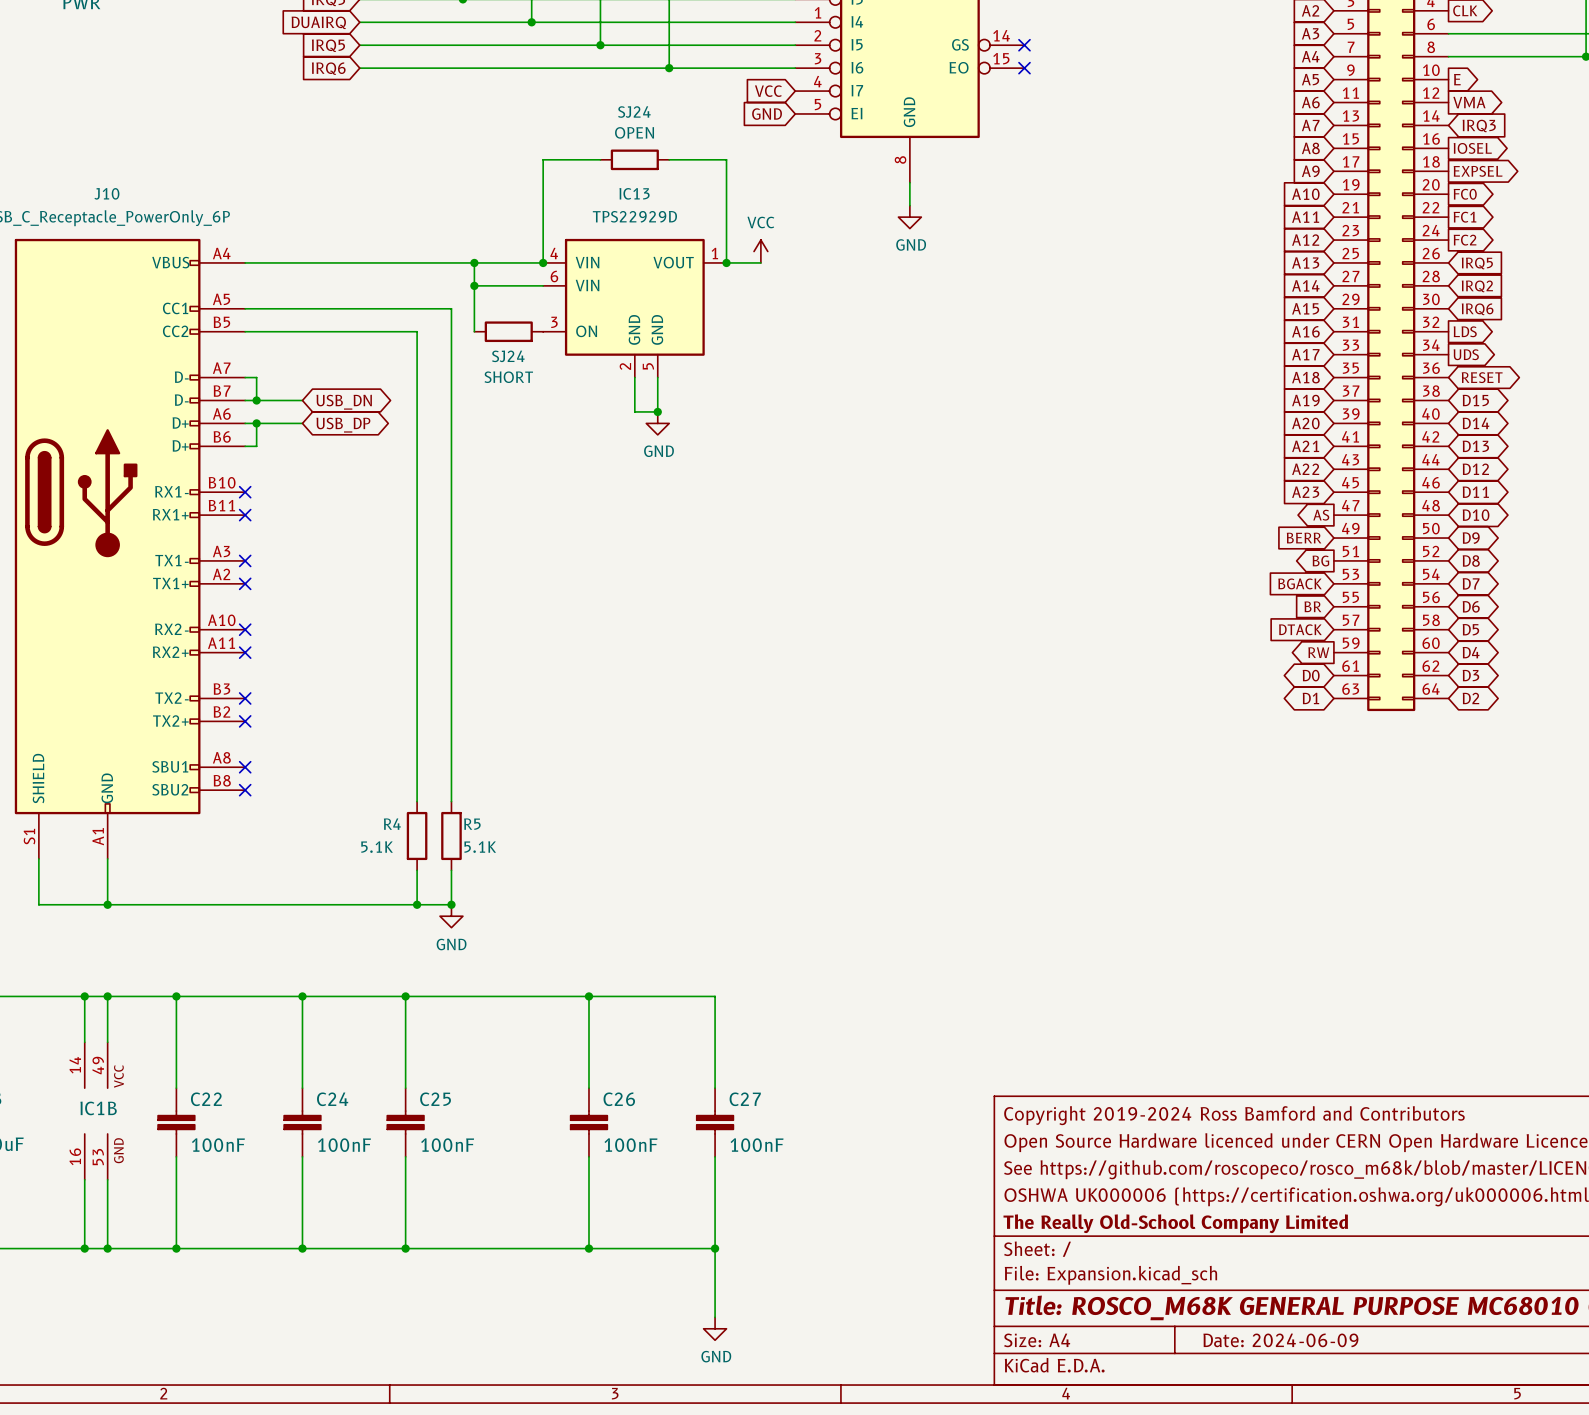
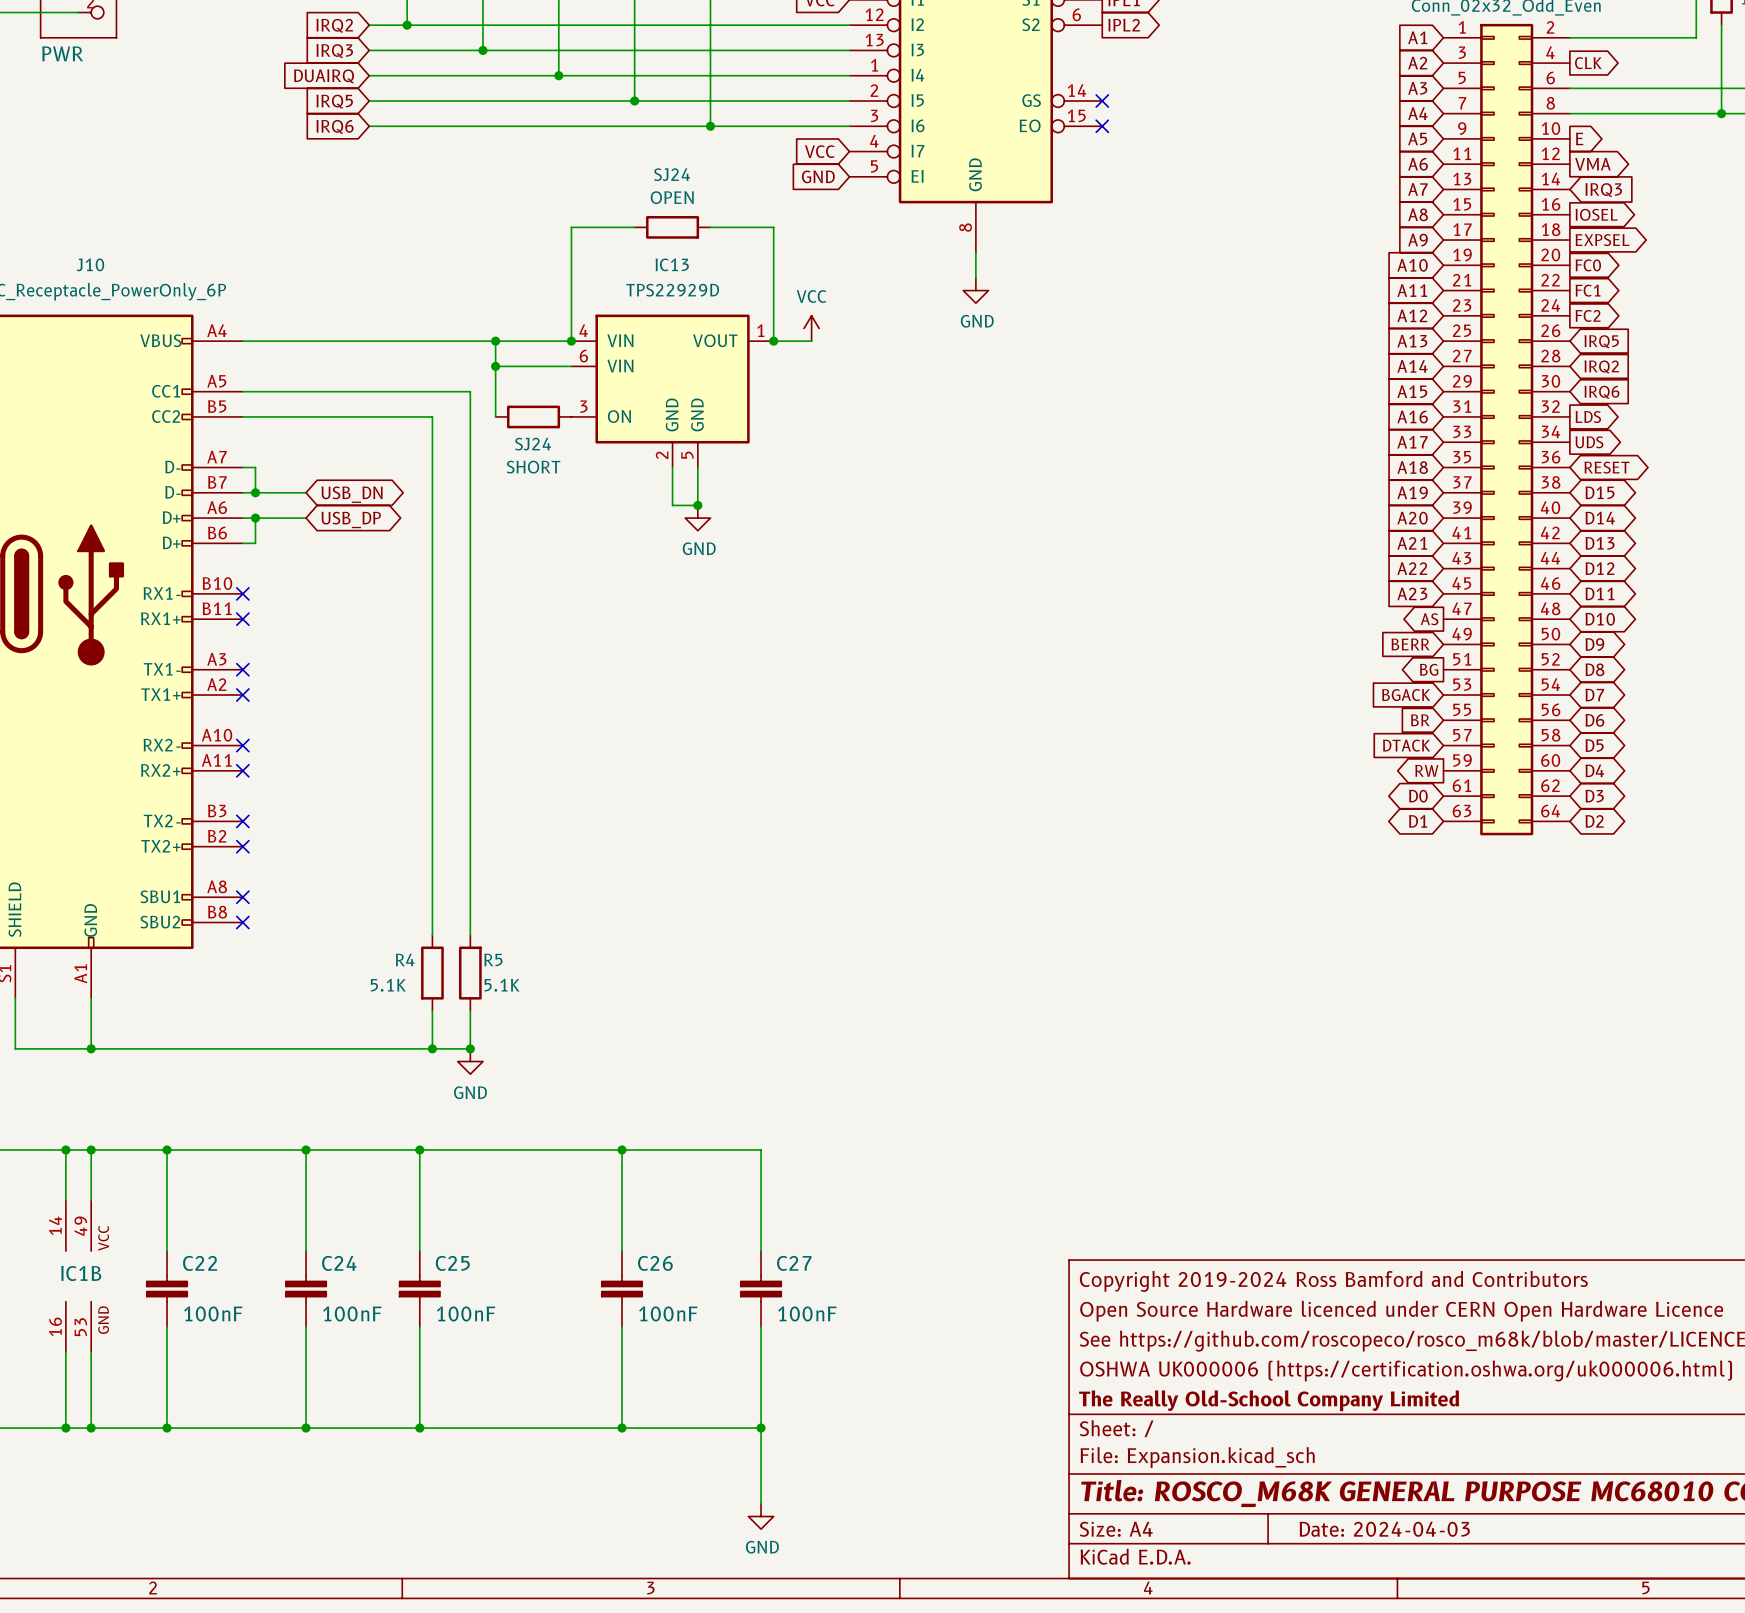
title block: Date: 2024-06-09 (1280, 1340) -> Date: 2024-04-03 (1384, 1529)

